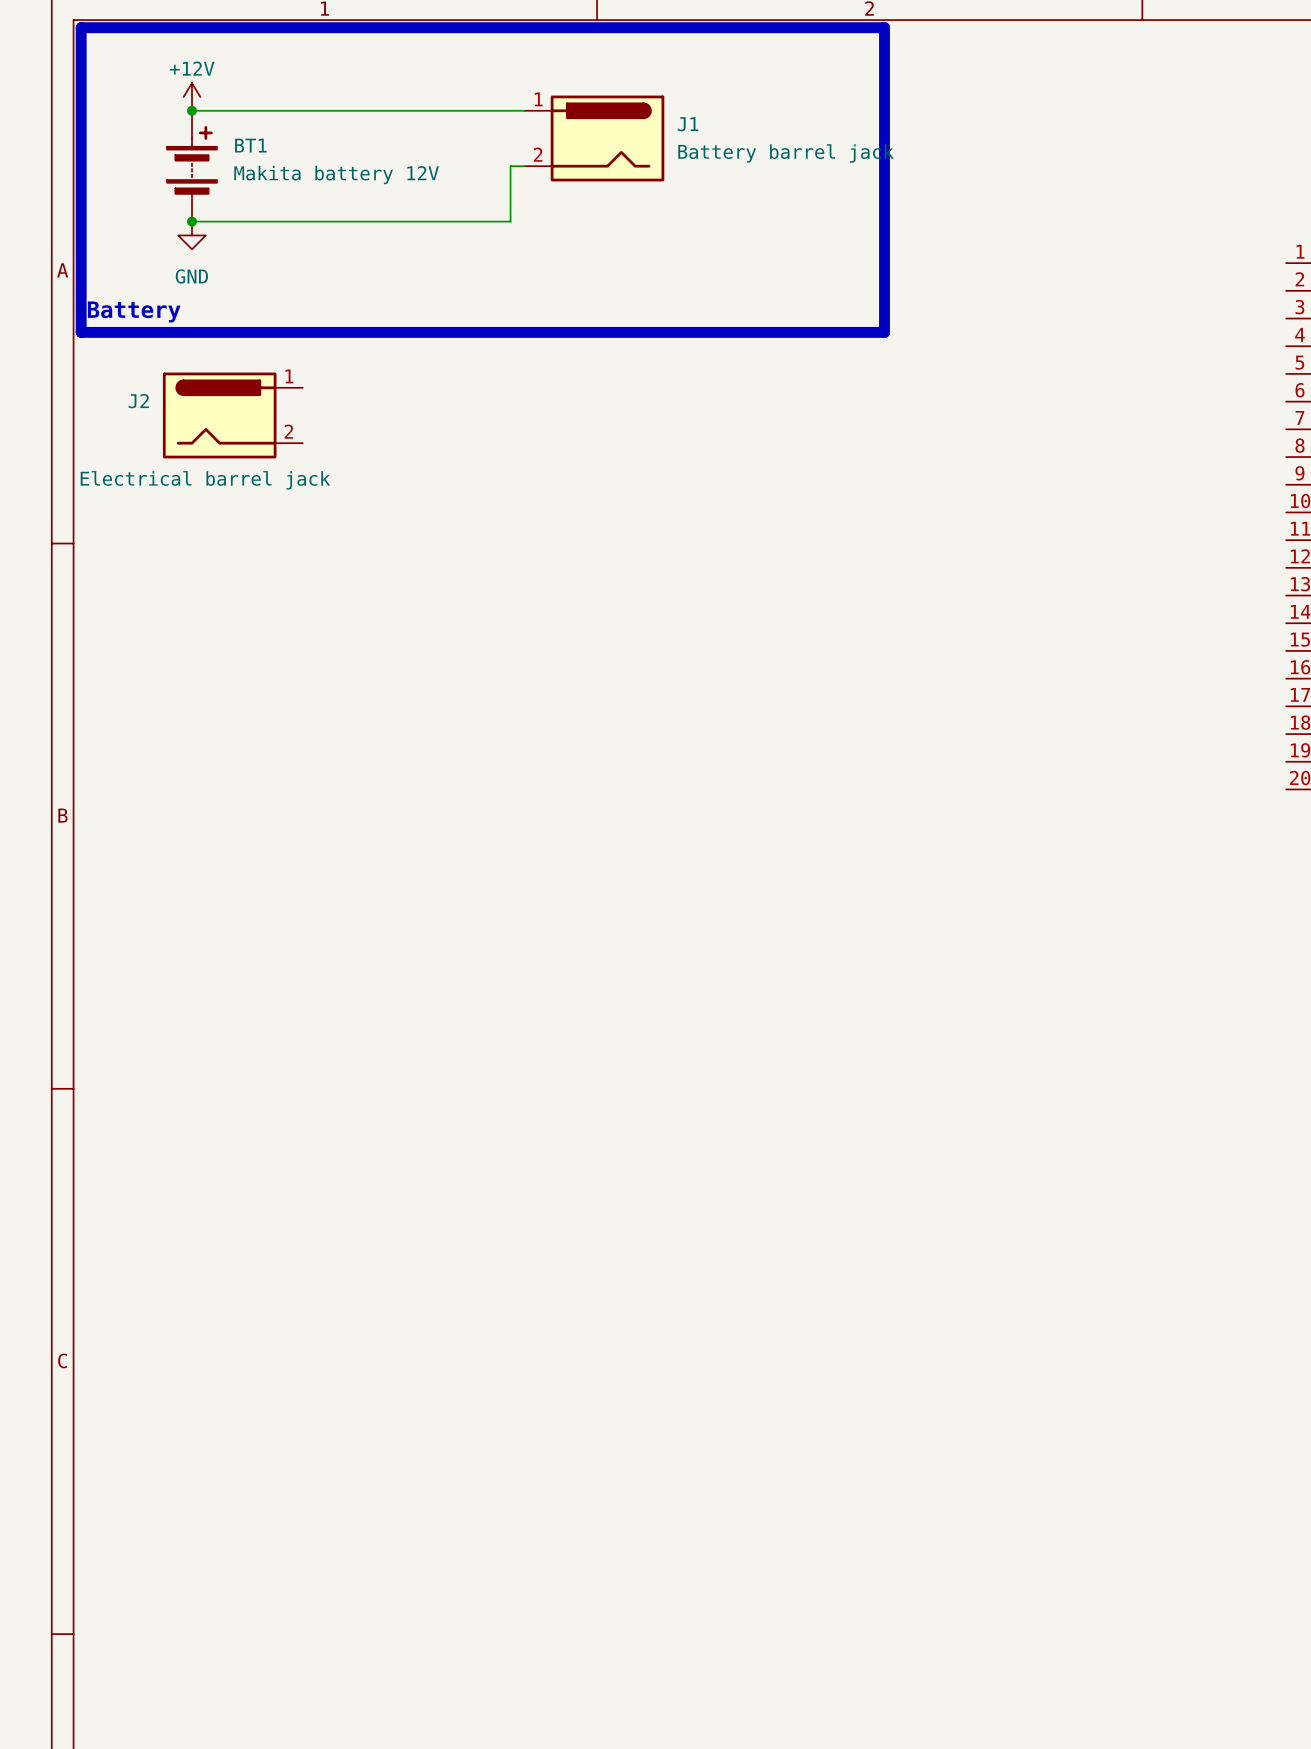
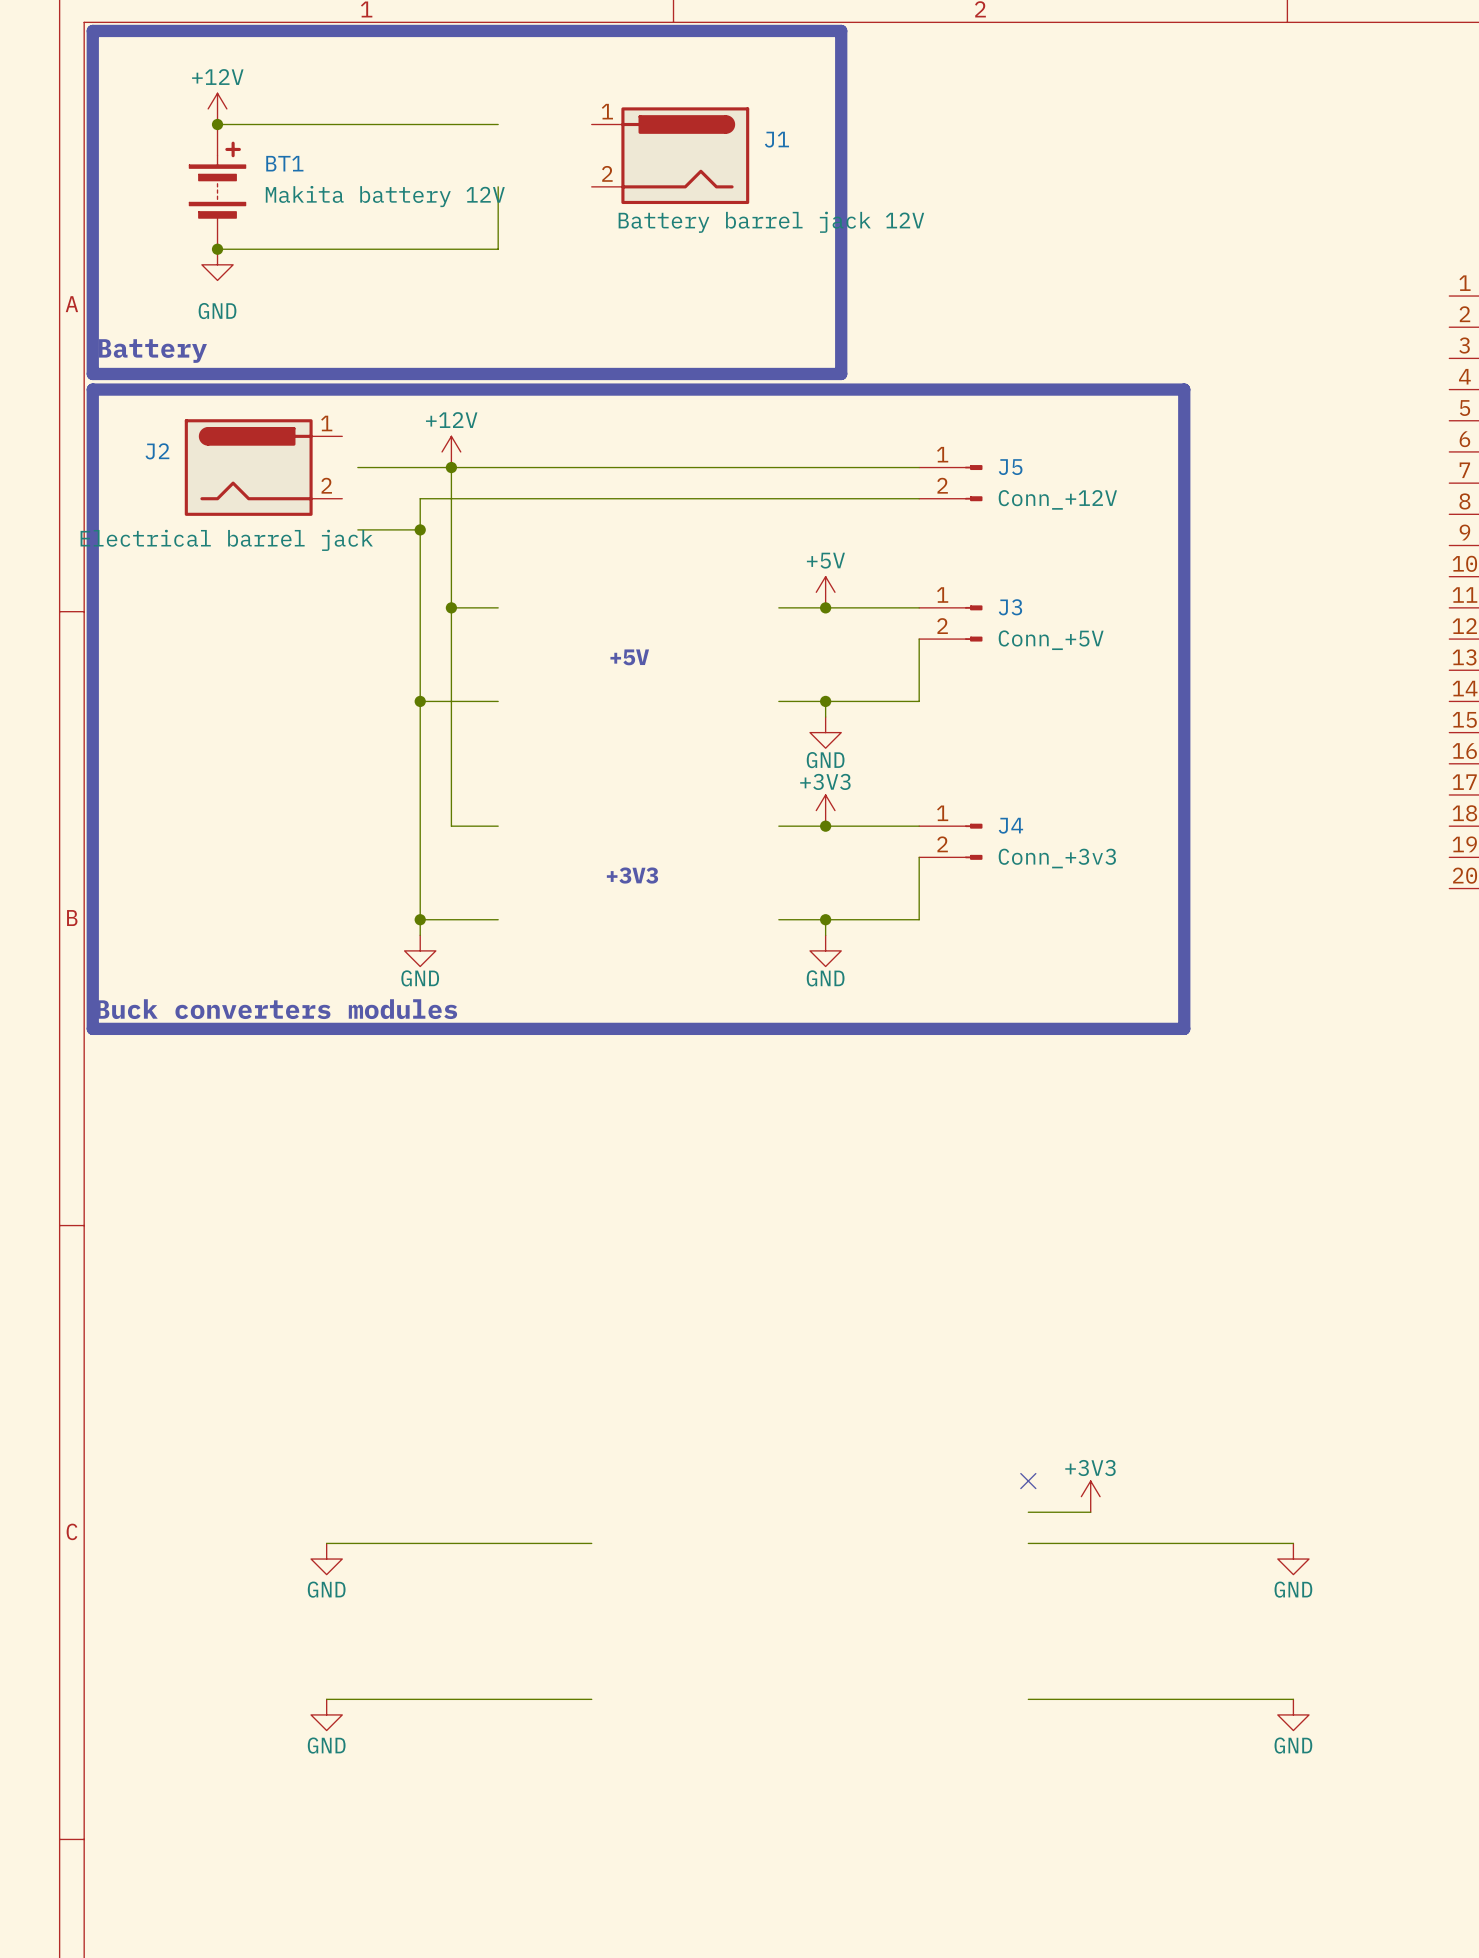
line: (746, 27) (884, 27) (884, 332) (746, 332) -> (841, 30) (841, 373)
wire: (441, 110) (524, 110) -> none
J1 value: Battery barrel jack (786, 153) -> Battery barrel jack 12V (771, 222)
wire: (524, 166) (510, 166) (510, 221) (441, 221) -> (498, 186) (498, 249)
line: none -> (92, 389) (92, 1028) (1184, 1028) (1184, 389) (92, 389)
power symbol: none -> +12V (451, 451)
wire: none -> (357, 467) (919, 467)
wire: none -> (451, 467) (451, 826) (498, 826)
junction: none -> (451, 467)
J5: none -> Conn_+12V (950, 483)
wire: none -> (919, 498) (420, 498) (420, 935)
wire: none -> (357, 529) (420, 529)
junction: none -> (420, 529)
power symbol: none -> +5V (825, 592)
wire: none -> (451, 607) (498, 607)
junction: none -> (451, 607)
wire: none -> (778, 607) (919, 607)
junction: none -> (825, 607)
J3: none -> Conn_+5V (950, 623)
wire: none -> (919, 639) (919, 701) (778, 701)
text: none -> +5V (629, 657)
wire: none -> (420, 701) (498, 701)
junction: none -> (420, 701)
wire: none -> (825, 701) (825, 717)
junction: none -> (825, 701)
power symbol: none -> GND (825, 732)
power symbol: none -> +3V3 (825, 810)
wire: none -> (778, 826) (919, 826)
junction: none -> (825, 826)
J4: none -> Conn_+3v3 (950, 841)
wire: none -> (919, 857) (919, 919) (778, 919)
text: none -> +3V3 (632, 875)
wire: none -> (420, 919) (498, 919)
junction: none -> (420, 919)
wire: none -> (825, 919) (825, 935)
junction: none -> (825, 919)
power symbol: none -> GND (420, 950)
power symbol: none -> GND (825, 950)
text: none -> Buck converters modules (276, 1009)
no-connect mark: none -> (1028, 1481)
power symbol: none -> +3V3 (1090, 1496)
wire: none -> (1028, 1512) (1090, 1512)
wire: none -> (326, 1543) (591, 1543)
wire: none -> (1028, 1543) (1293, 1543)
power symbol: none -> GND (326, 1559)
power symbol: none -> GND (1293, 1559)
wire: none -> (326, 1699) (591, 1699)
wire: none -> (1028, 1699) (1293, 1699)
power symbol: none -> GND (326, 1714)
power symbol: none -> GND (1293, 1714)

